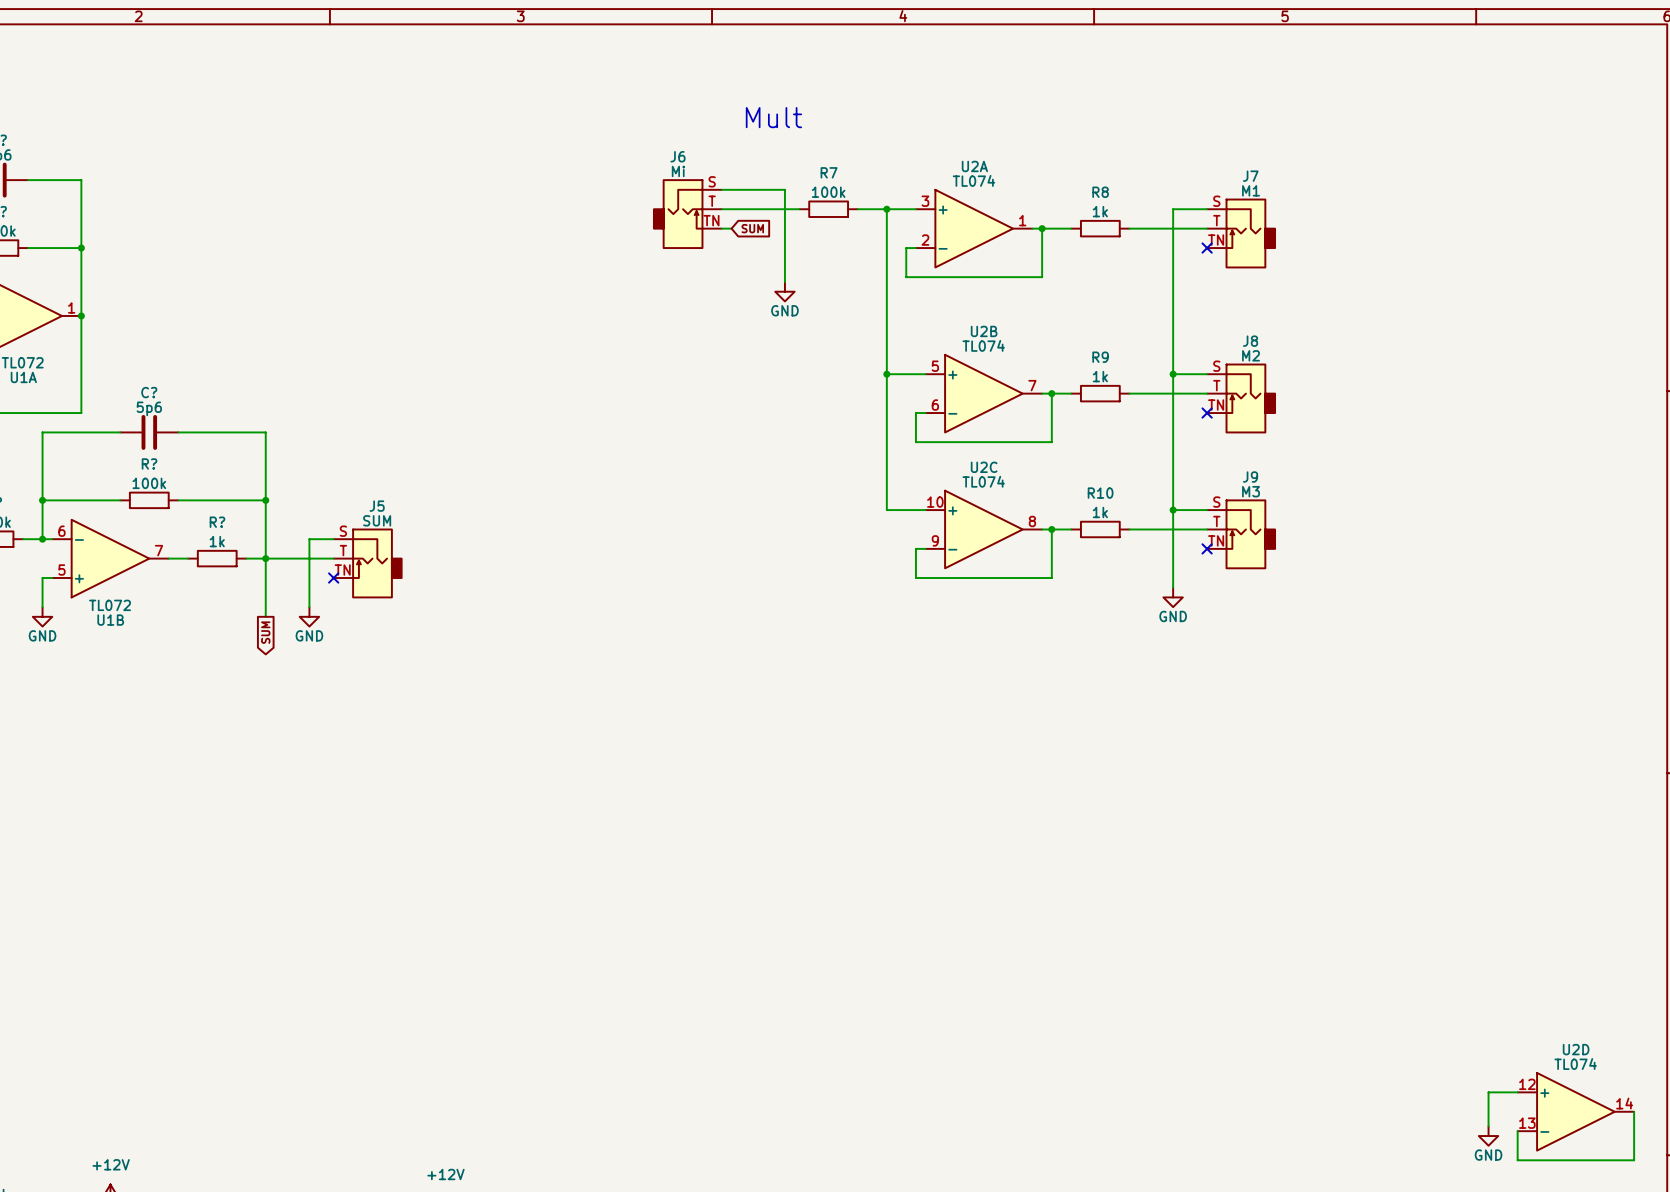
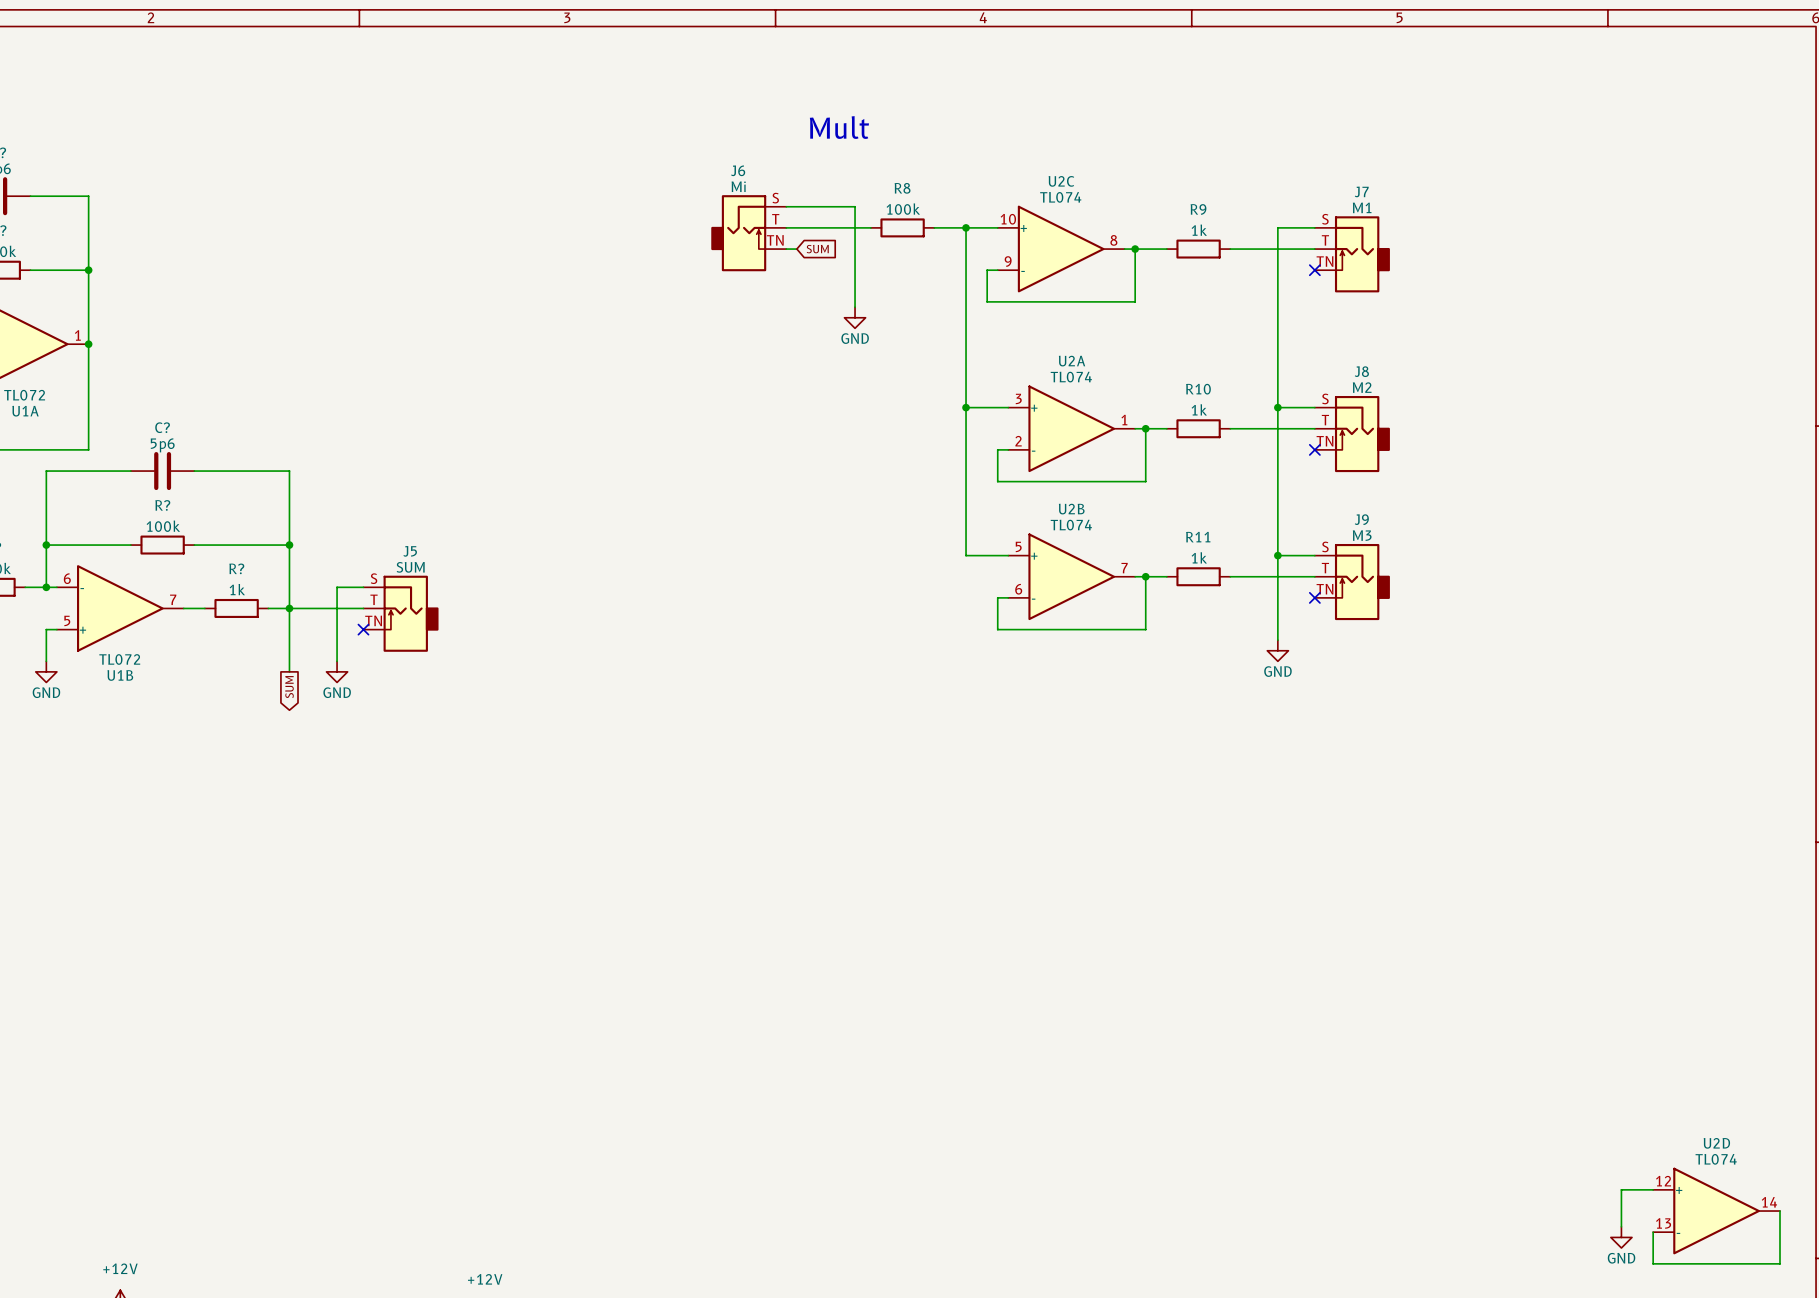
R7 name: R7 (829, 172) -> R8 (902, 188)
R8 name: R8 (1100, 192) -> R9 (1198, 209)
U2A position: (974, 228) -> (1071, 428)
R9 name: R9 (1100, 357) -> R10 (1198, 389)
U2B position: (983, 393) -> (1071, 576)
R10 name: R10 (1100, 493) -> R11 (1198, 537)
U2C position: (983, 529) -> (1061, 249)

